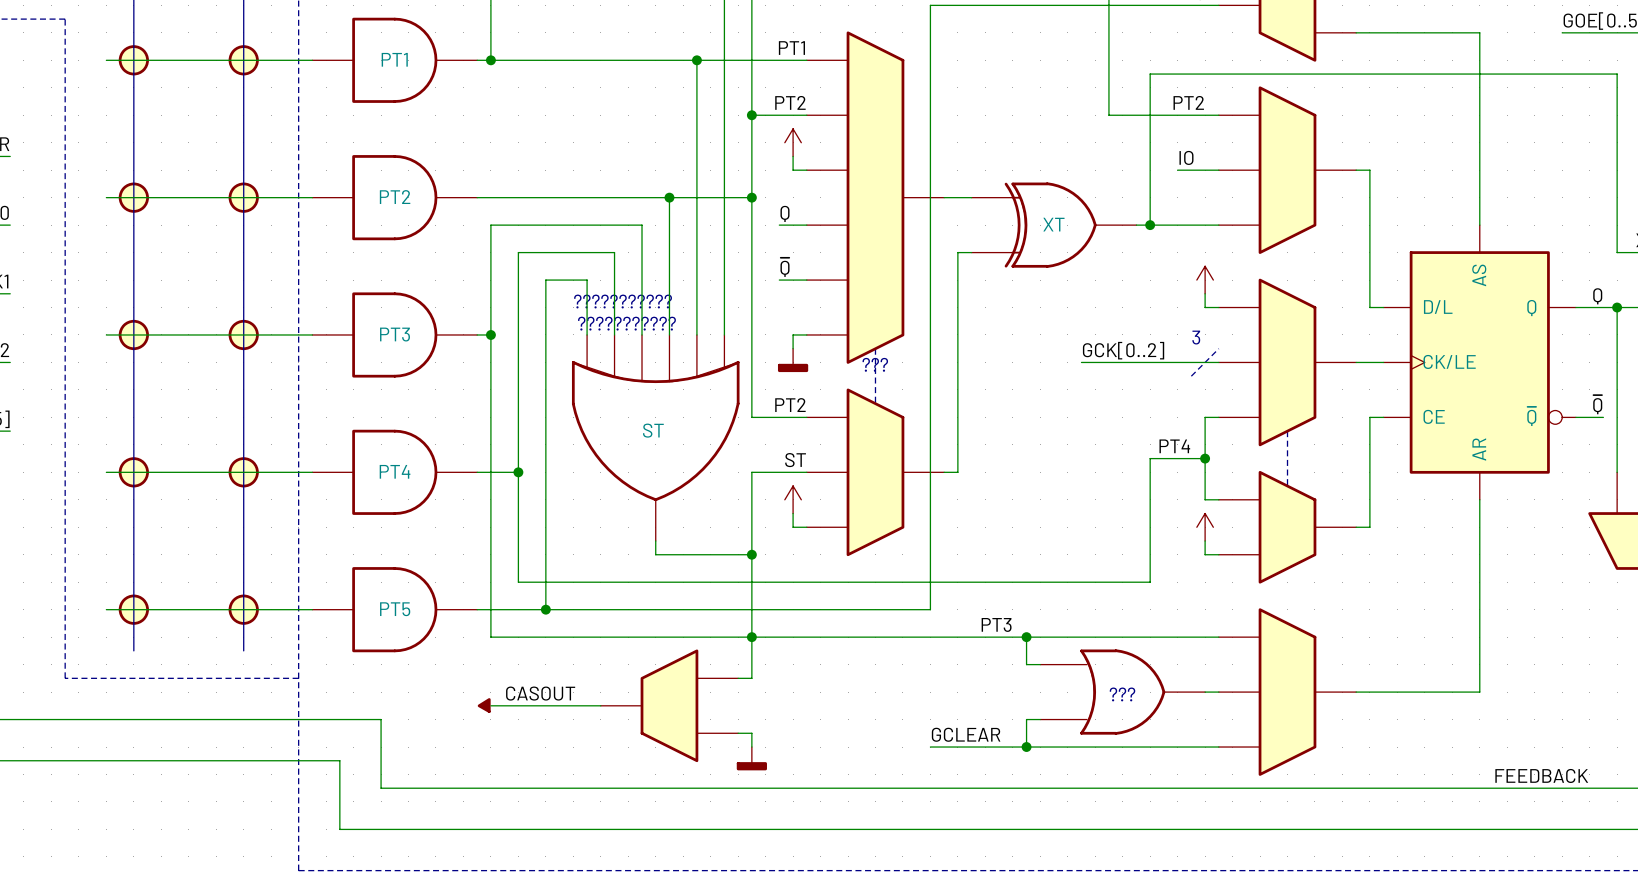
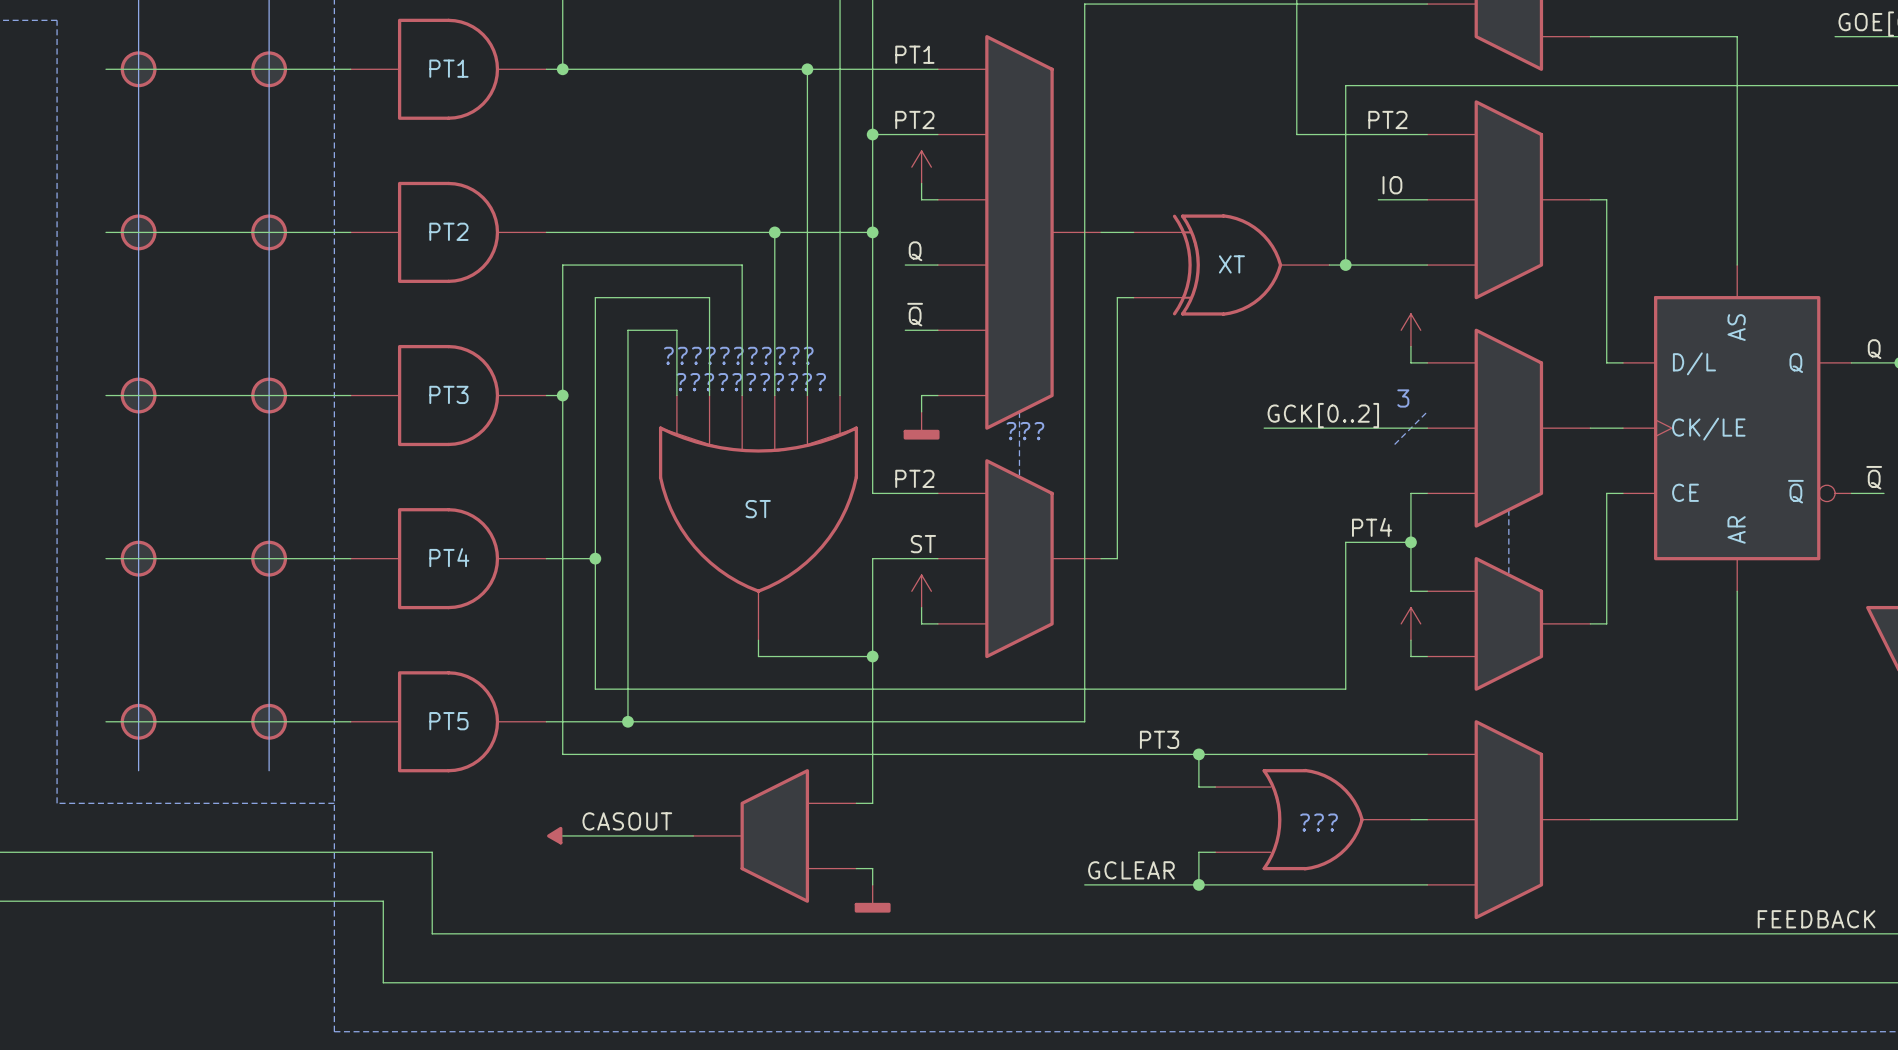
junction: (751, 637) -> none

